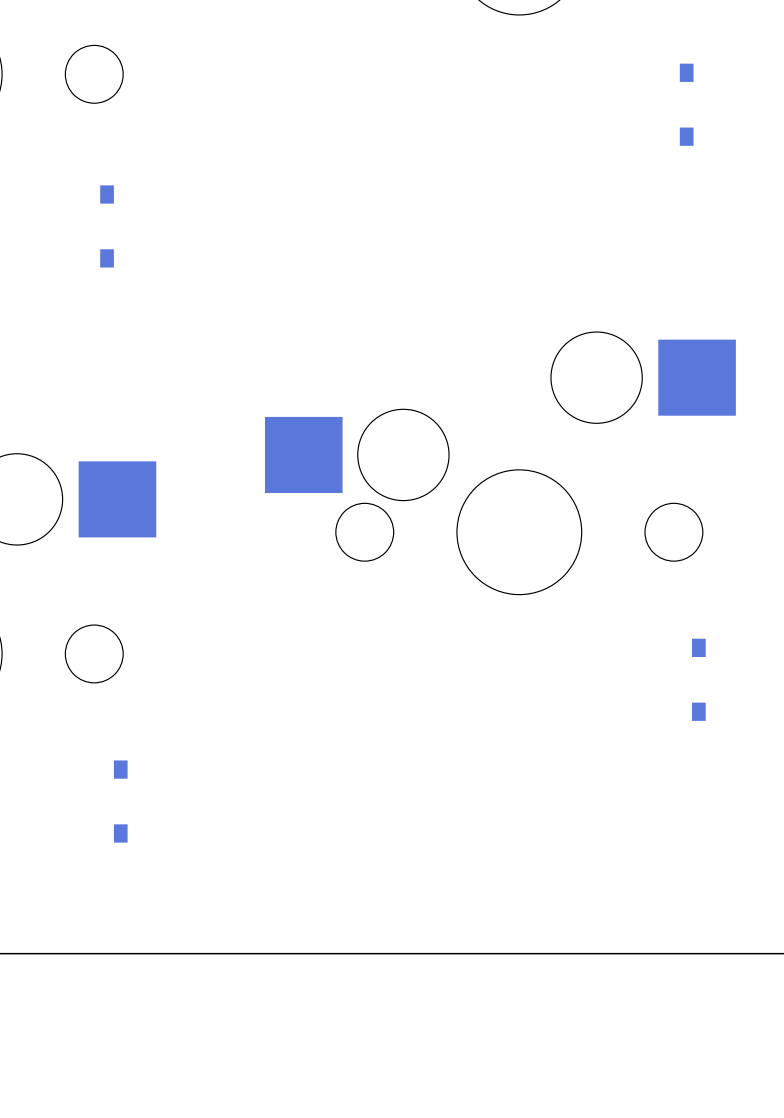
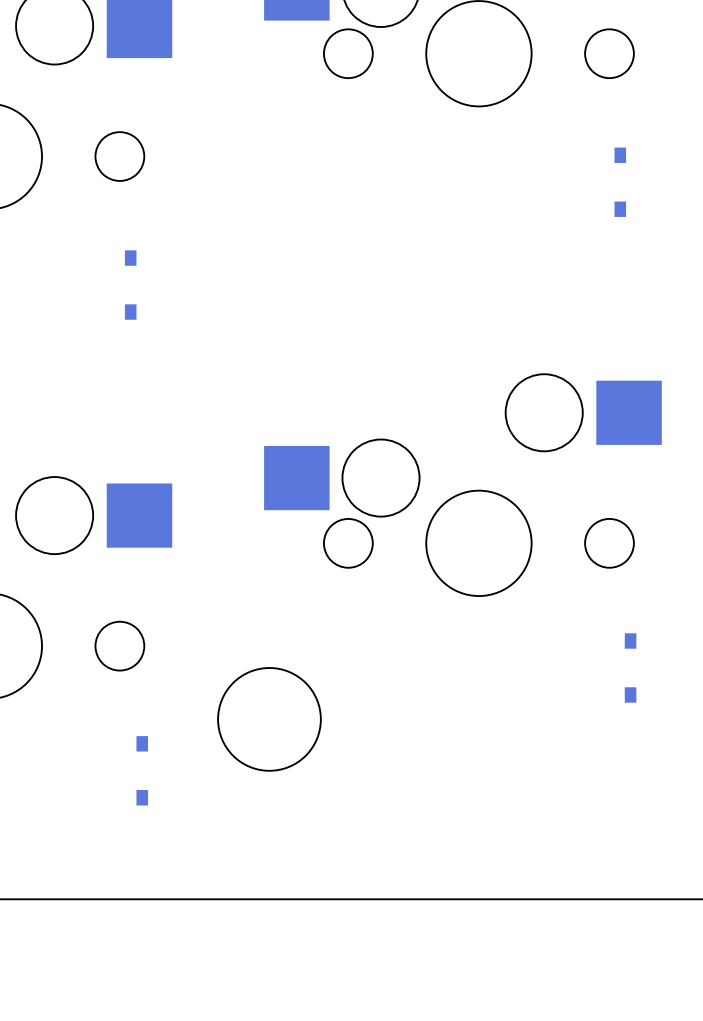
round board edge: none -> [217, 667, 322, 772]

